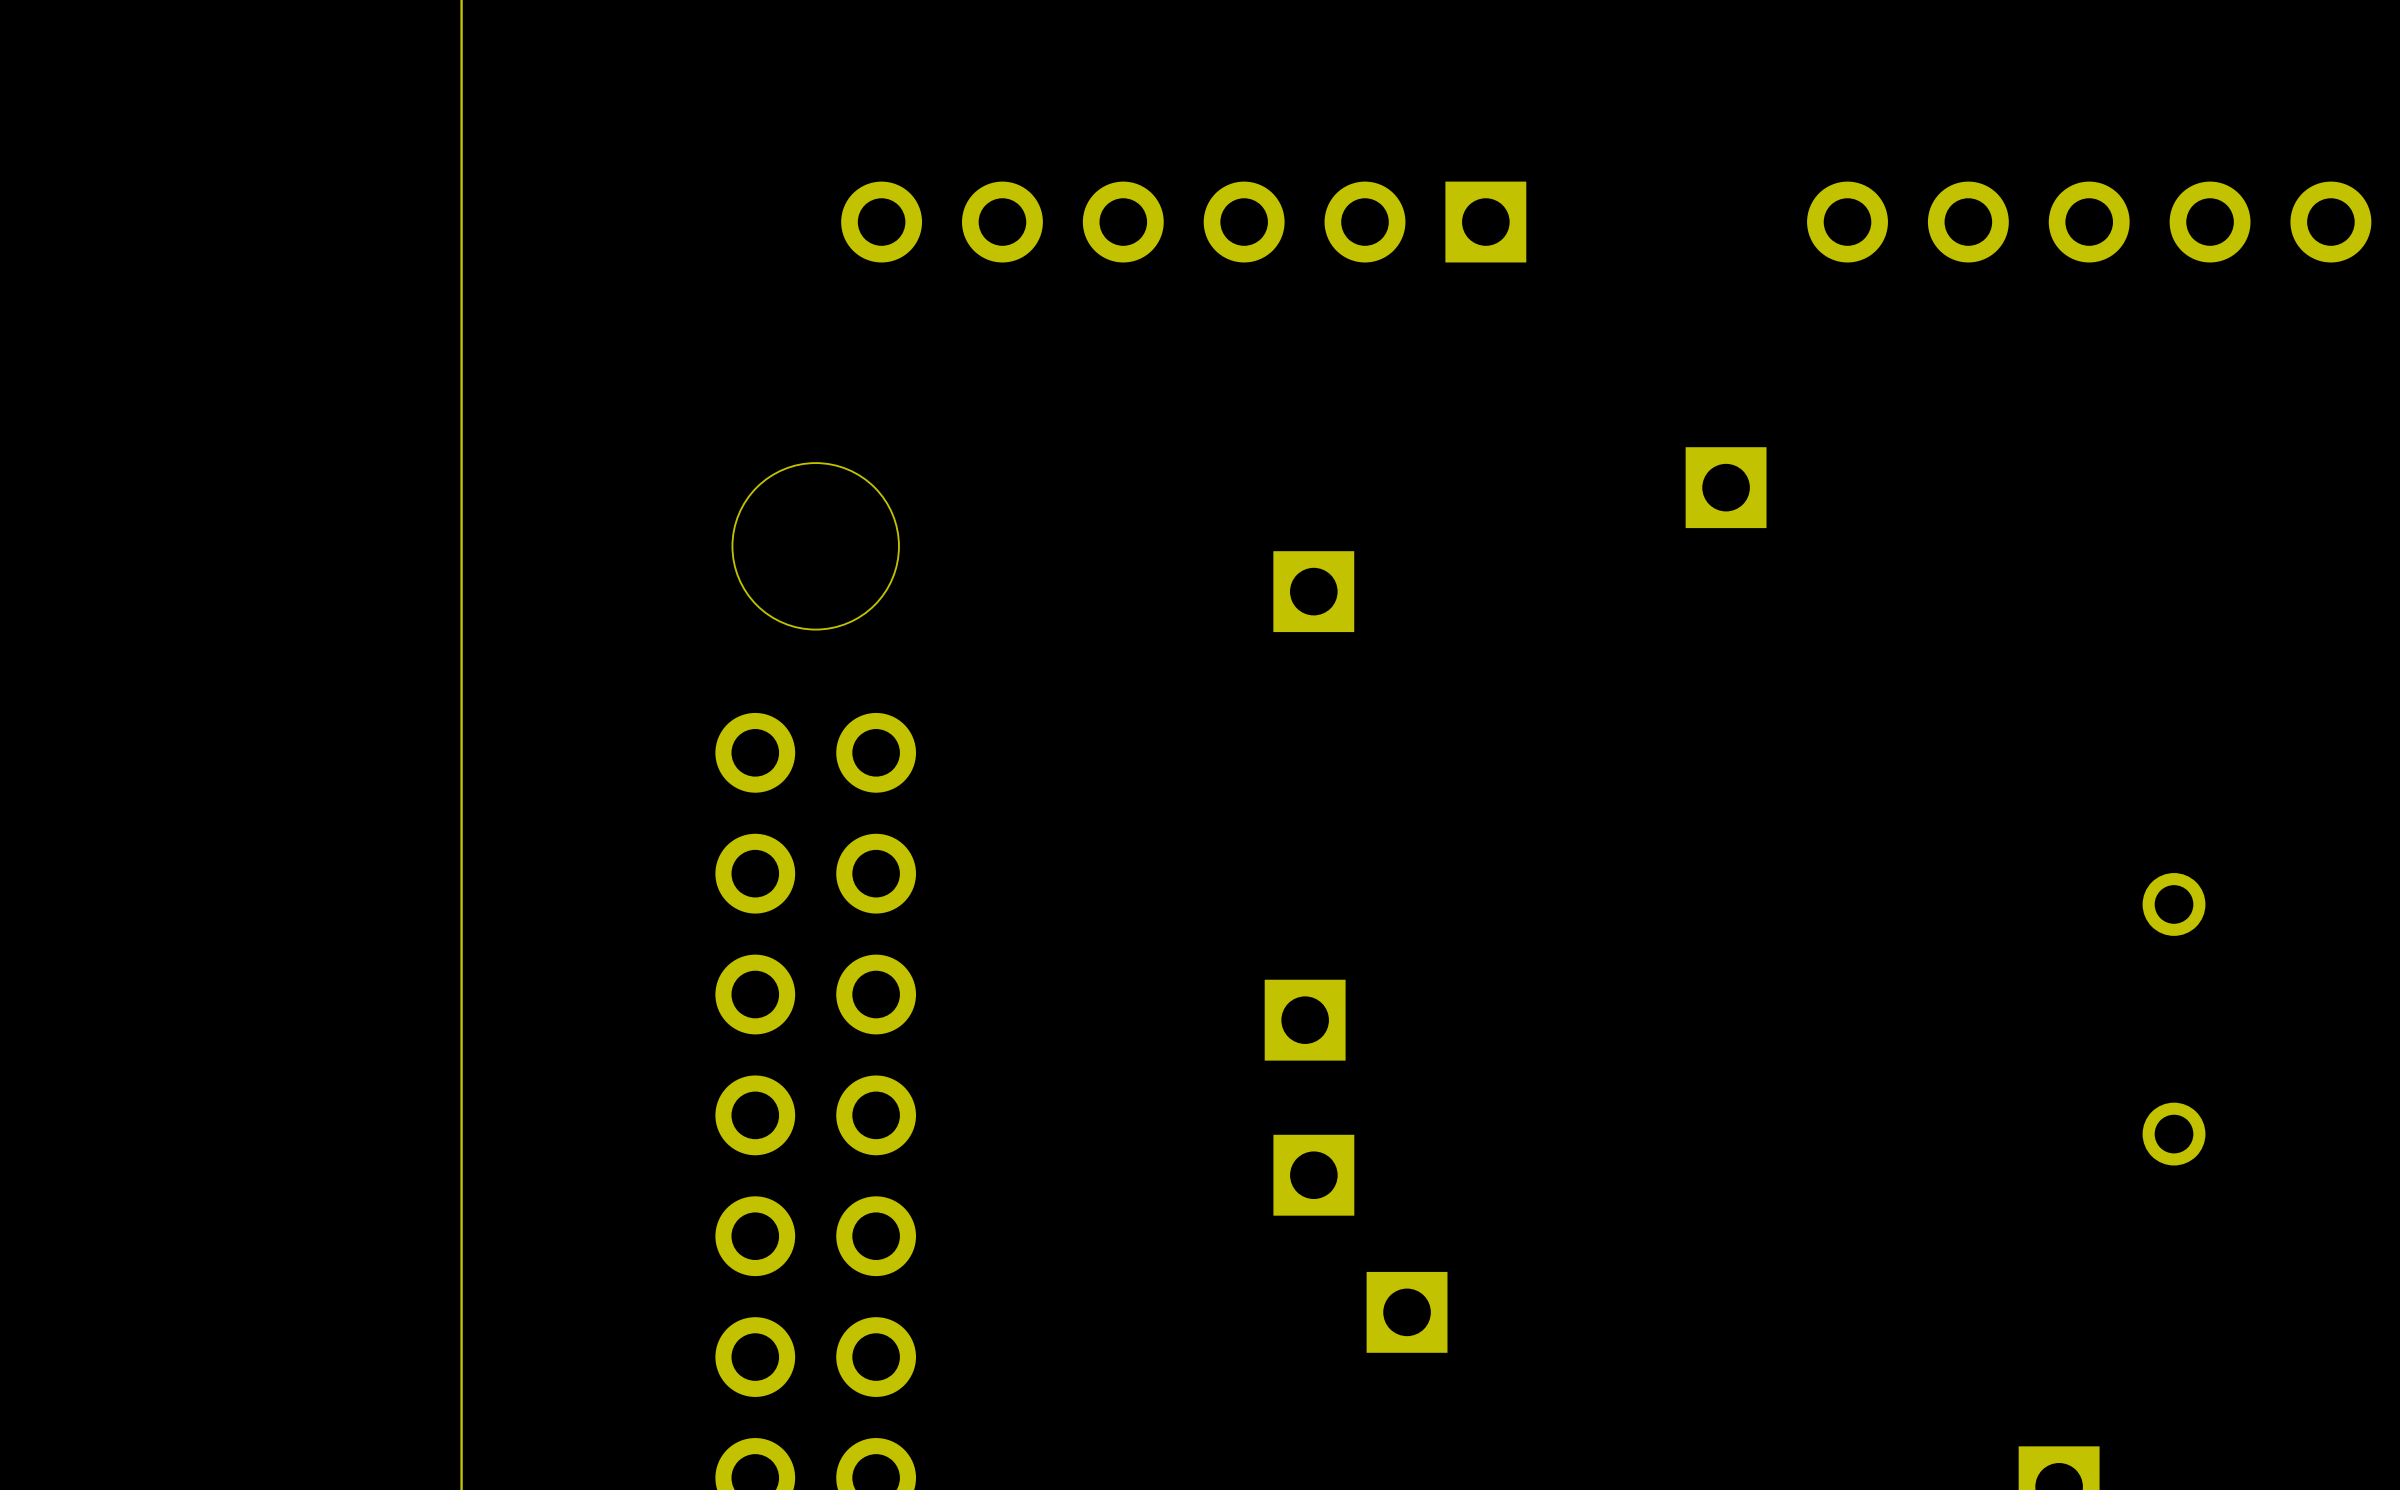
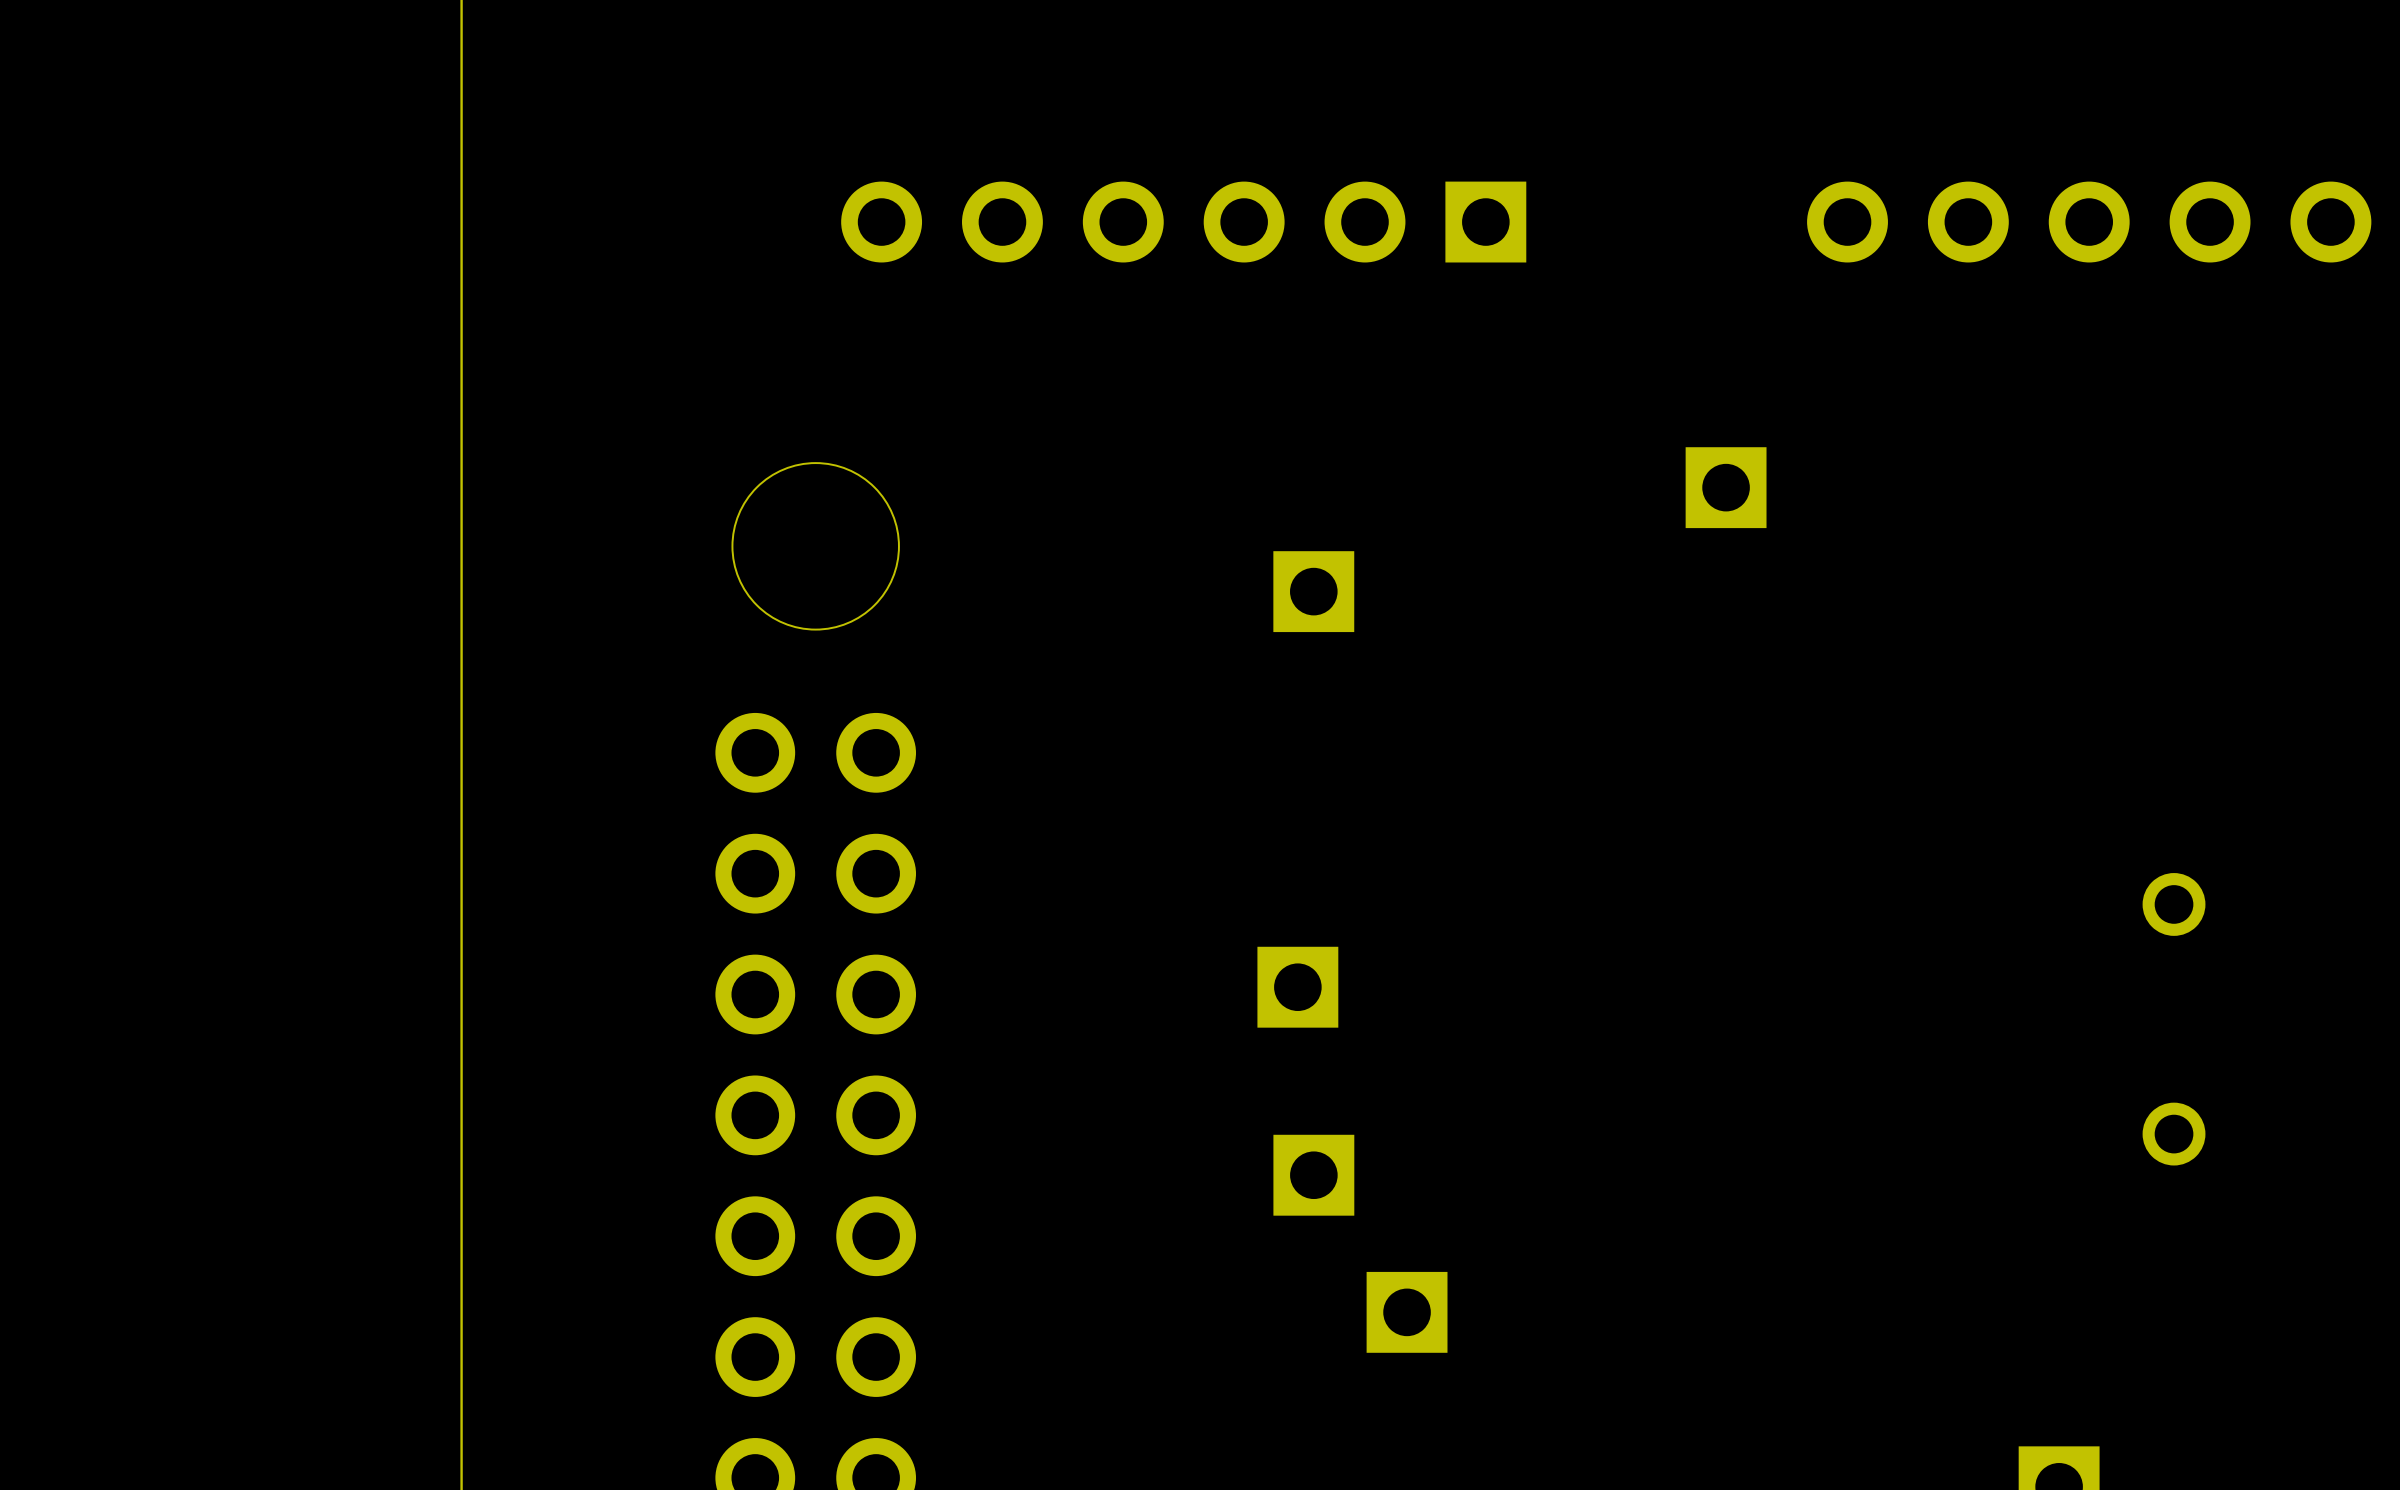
part position: (1305, 1020) -> (1297, 987)

